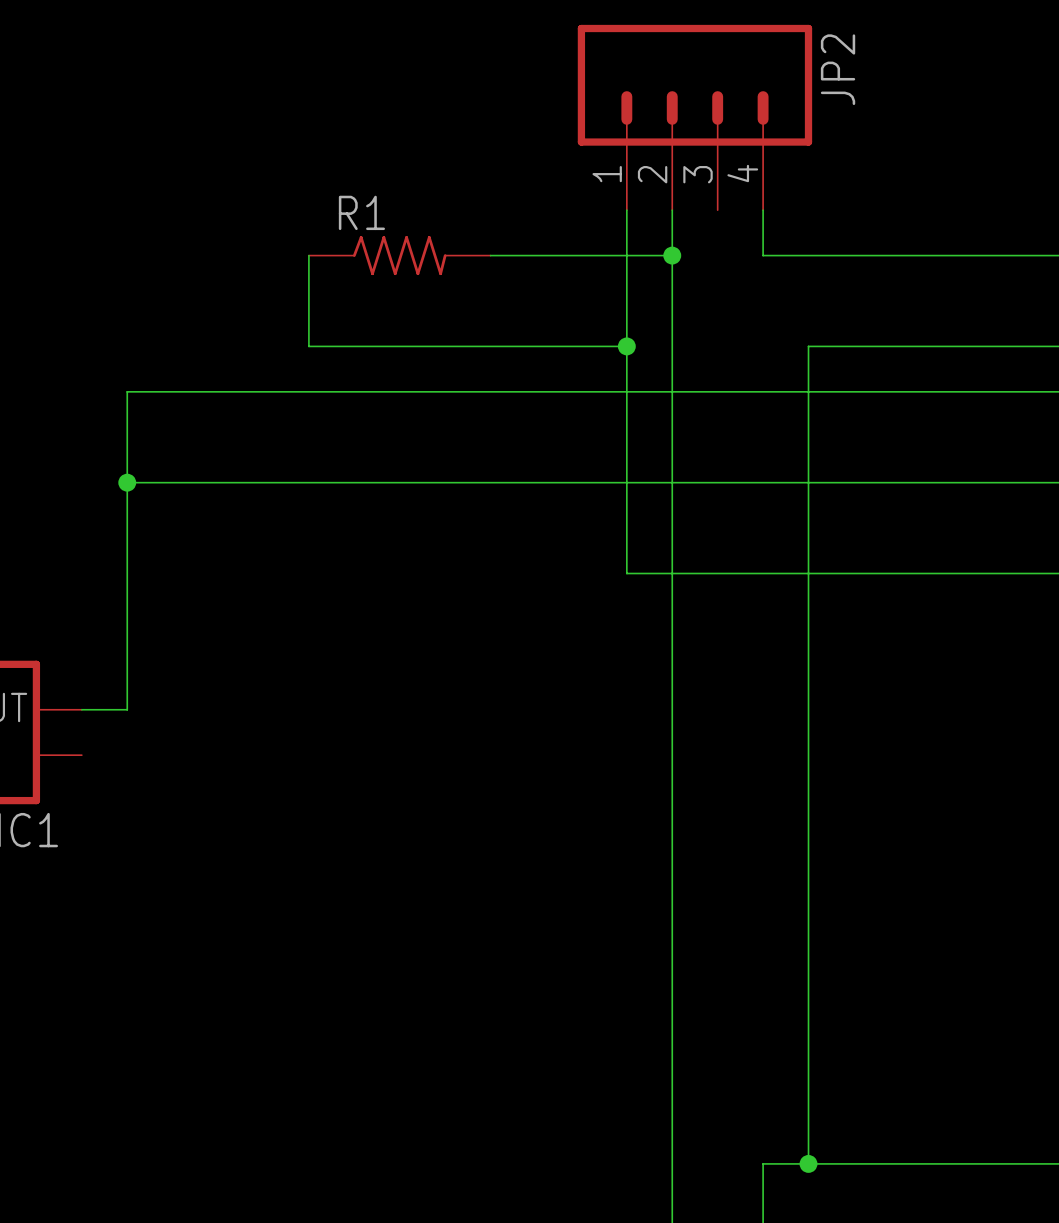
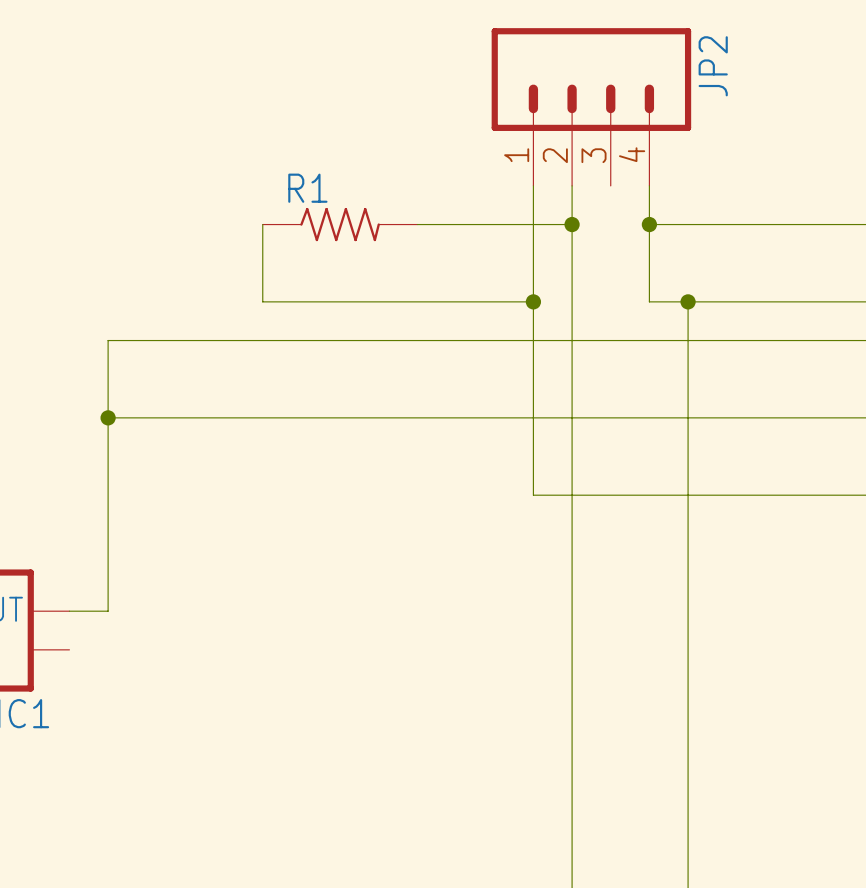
wire: none -> (649, 224) (649, 301) (688, 301)
junction: none -> (649, 224)
junction: none -> (688, 301)

